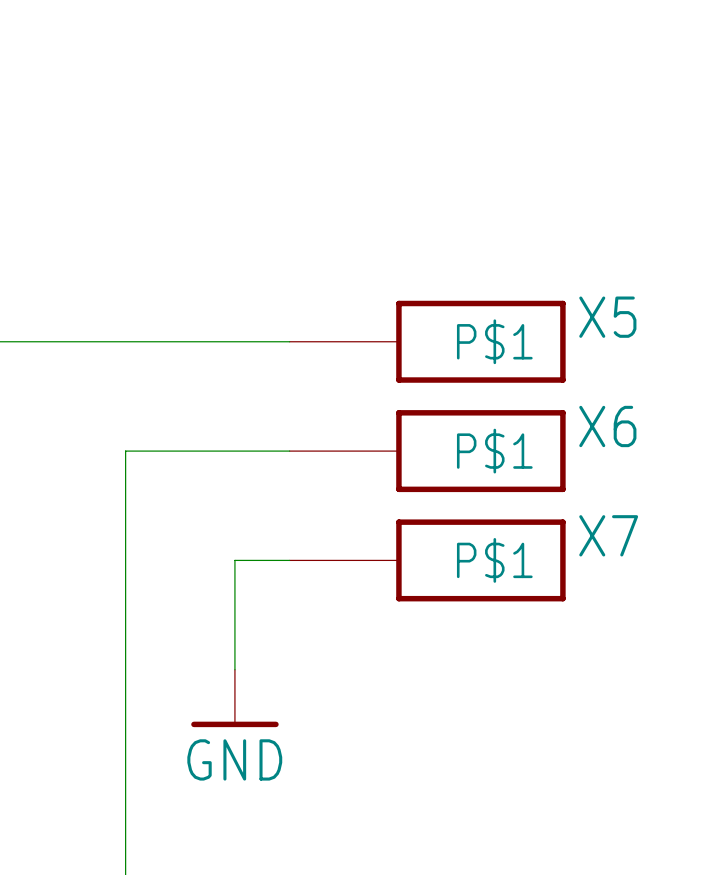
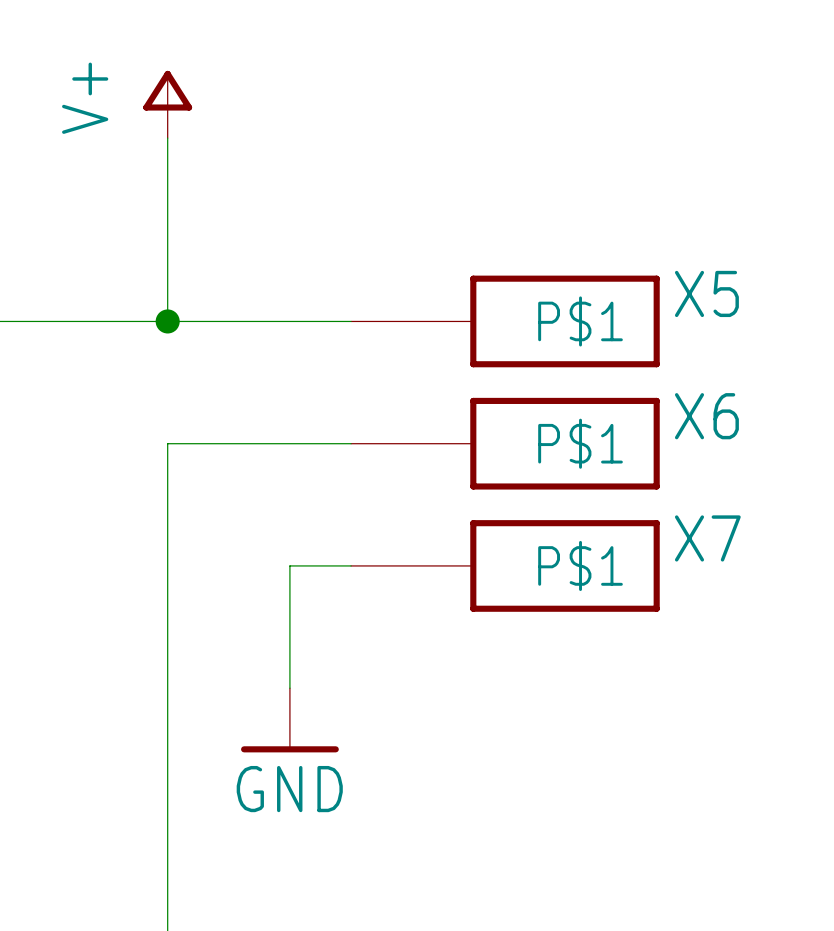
power symbol: none -> V+ (167, 104)
wire: none -> (167, 138) (167, 321)
junction: none -> (167, 321)

